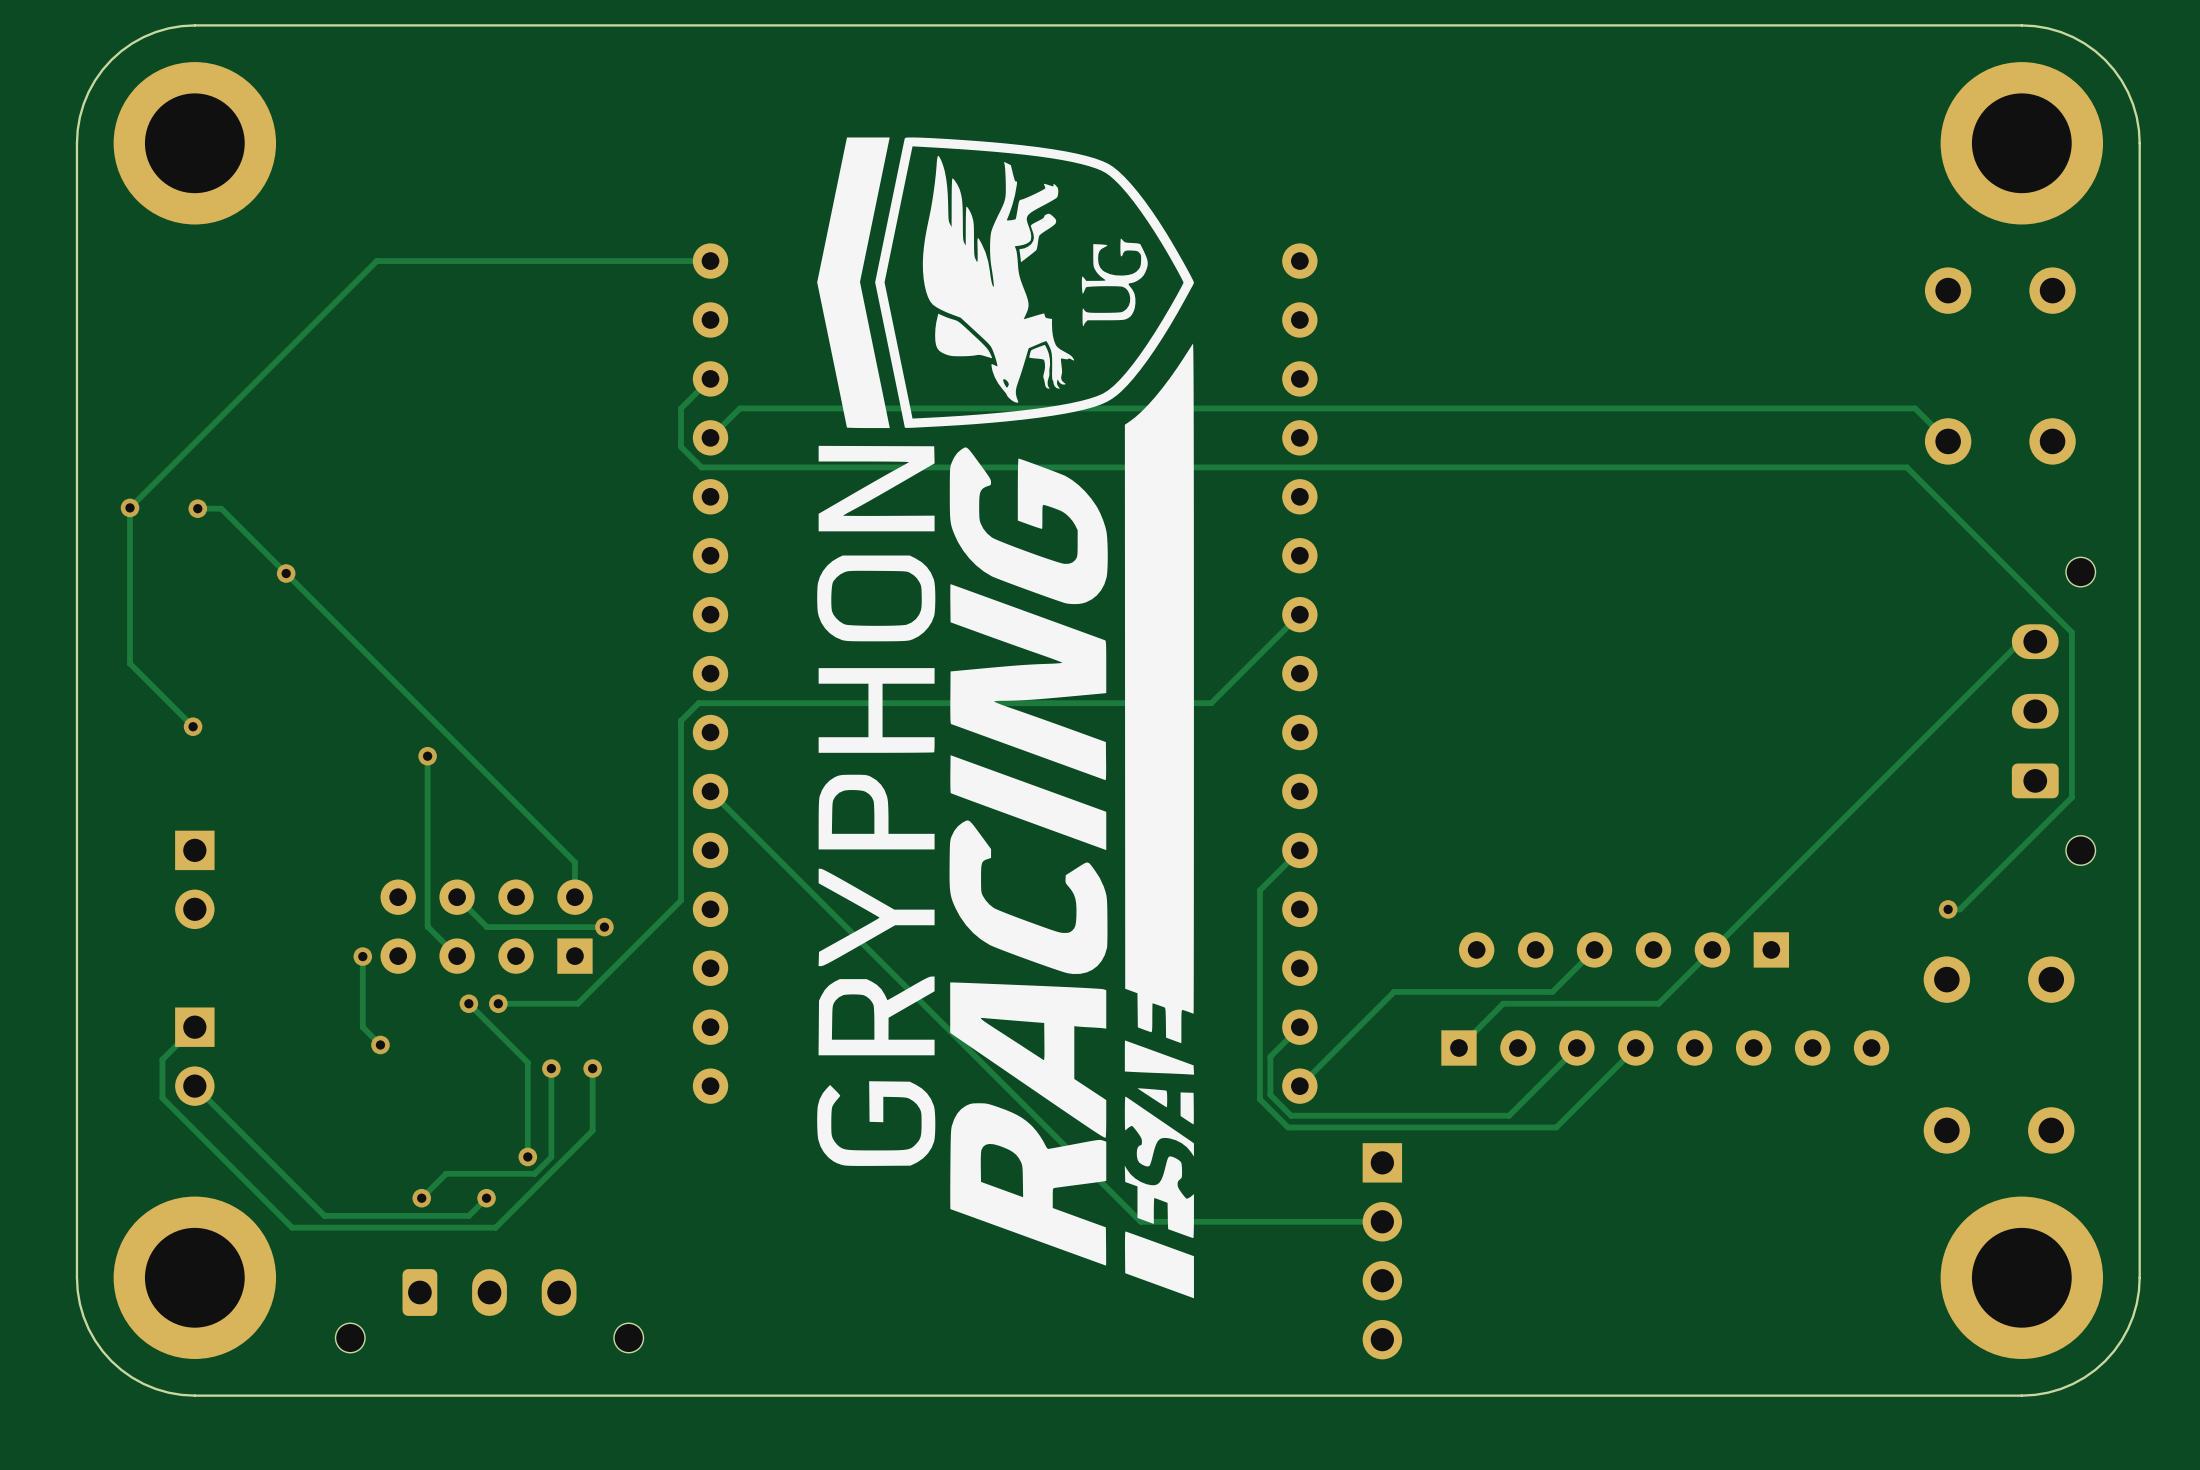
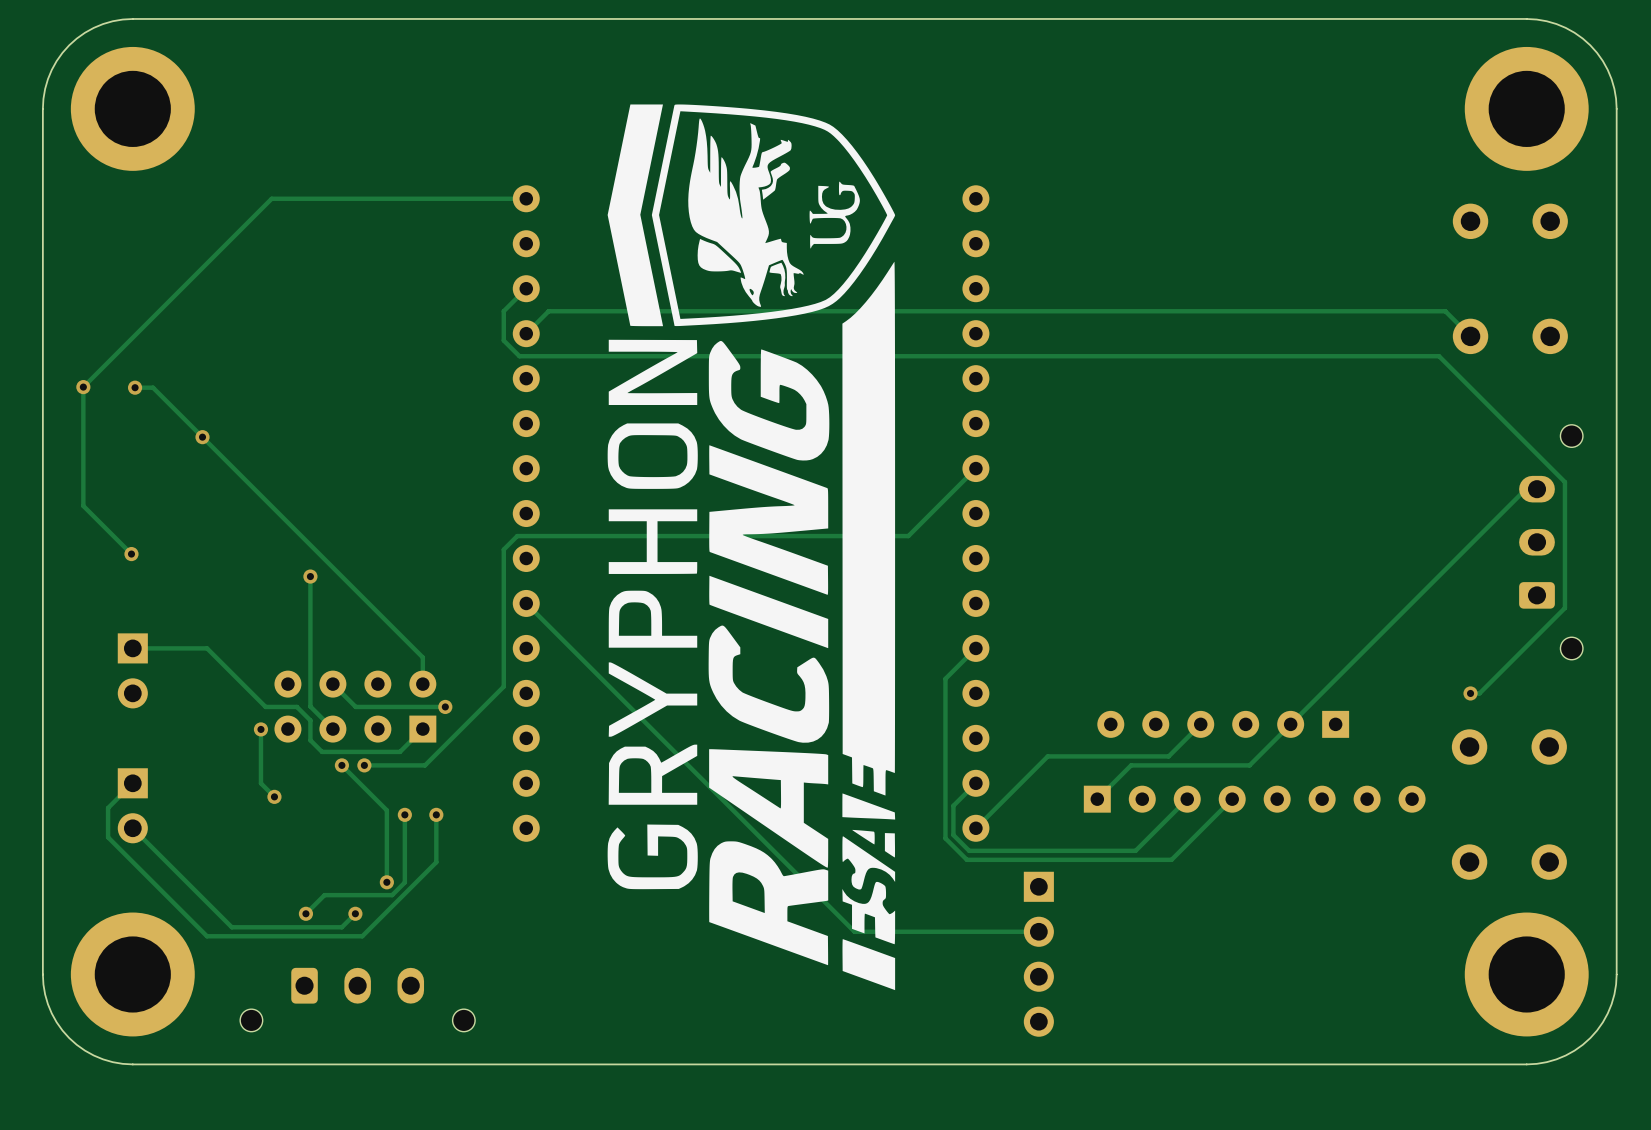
track: none -> (132, 648) (207, 648) (265, 706) (296, 706) (310, 720) (310, 740) (322, 751) (400, 751) (422, 729)

